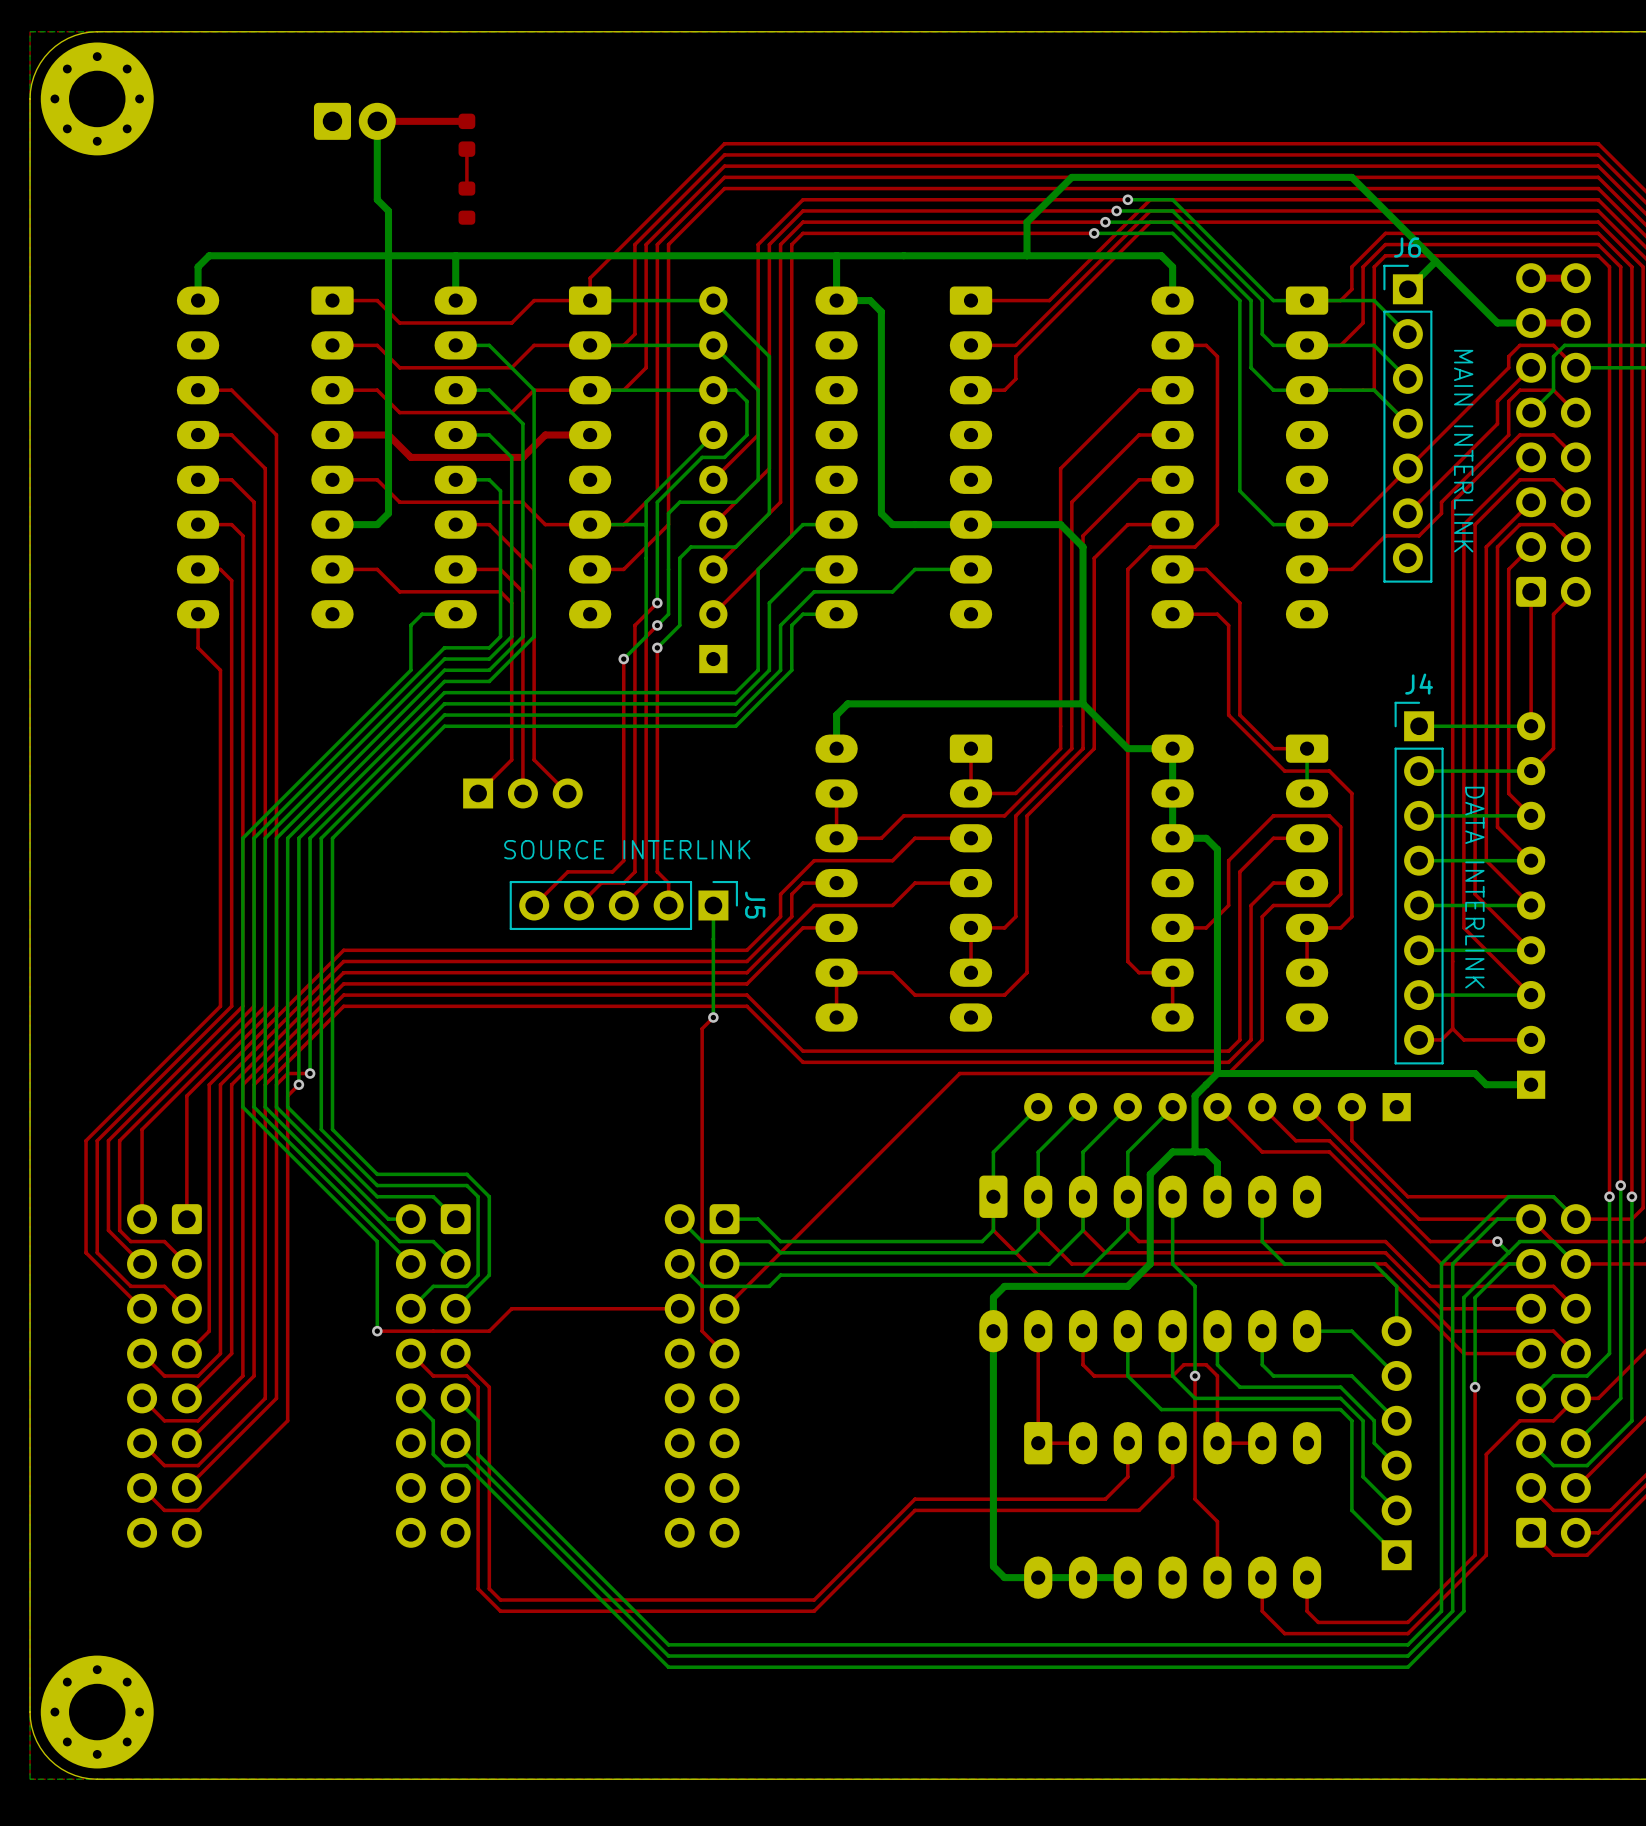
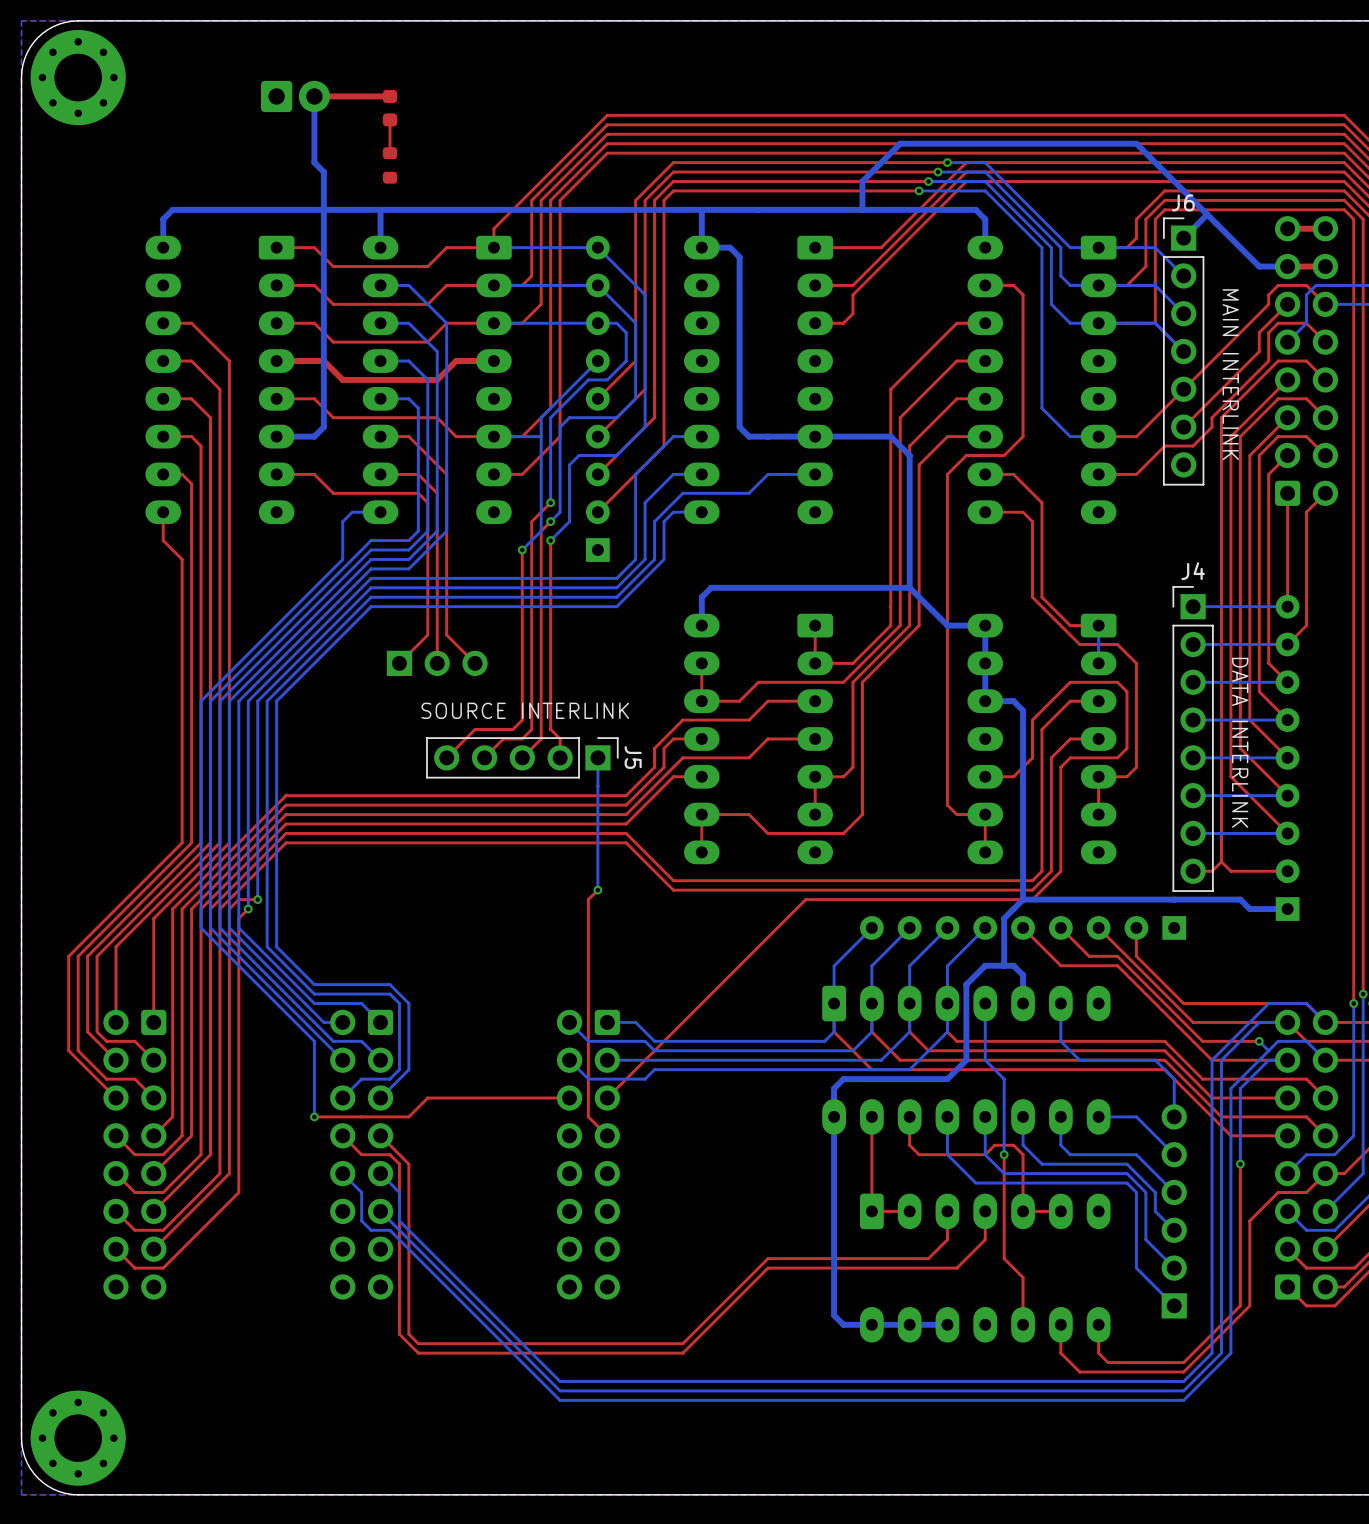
top track: (713, 1017) (702, 1028) (702, 1073) -> (597, 890) (588, 899)
bottom track: none -> (597, 852) (597, 890)
via position: (713, 1017) -> (597, 890)

